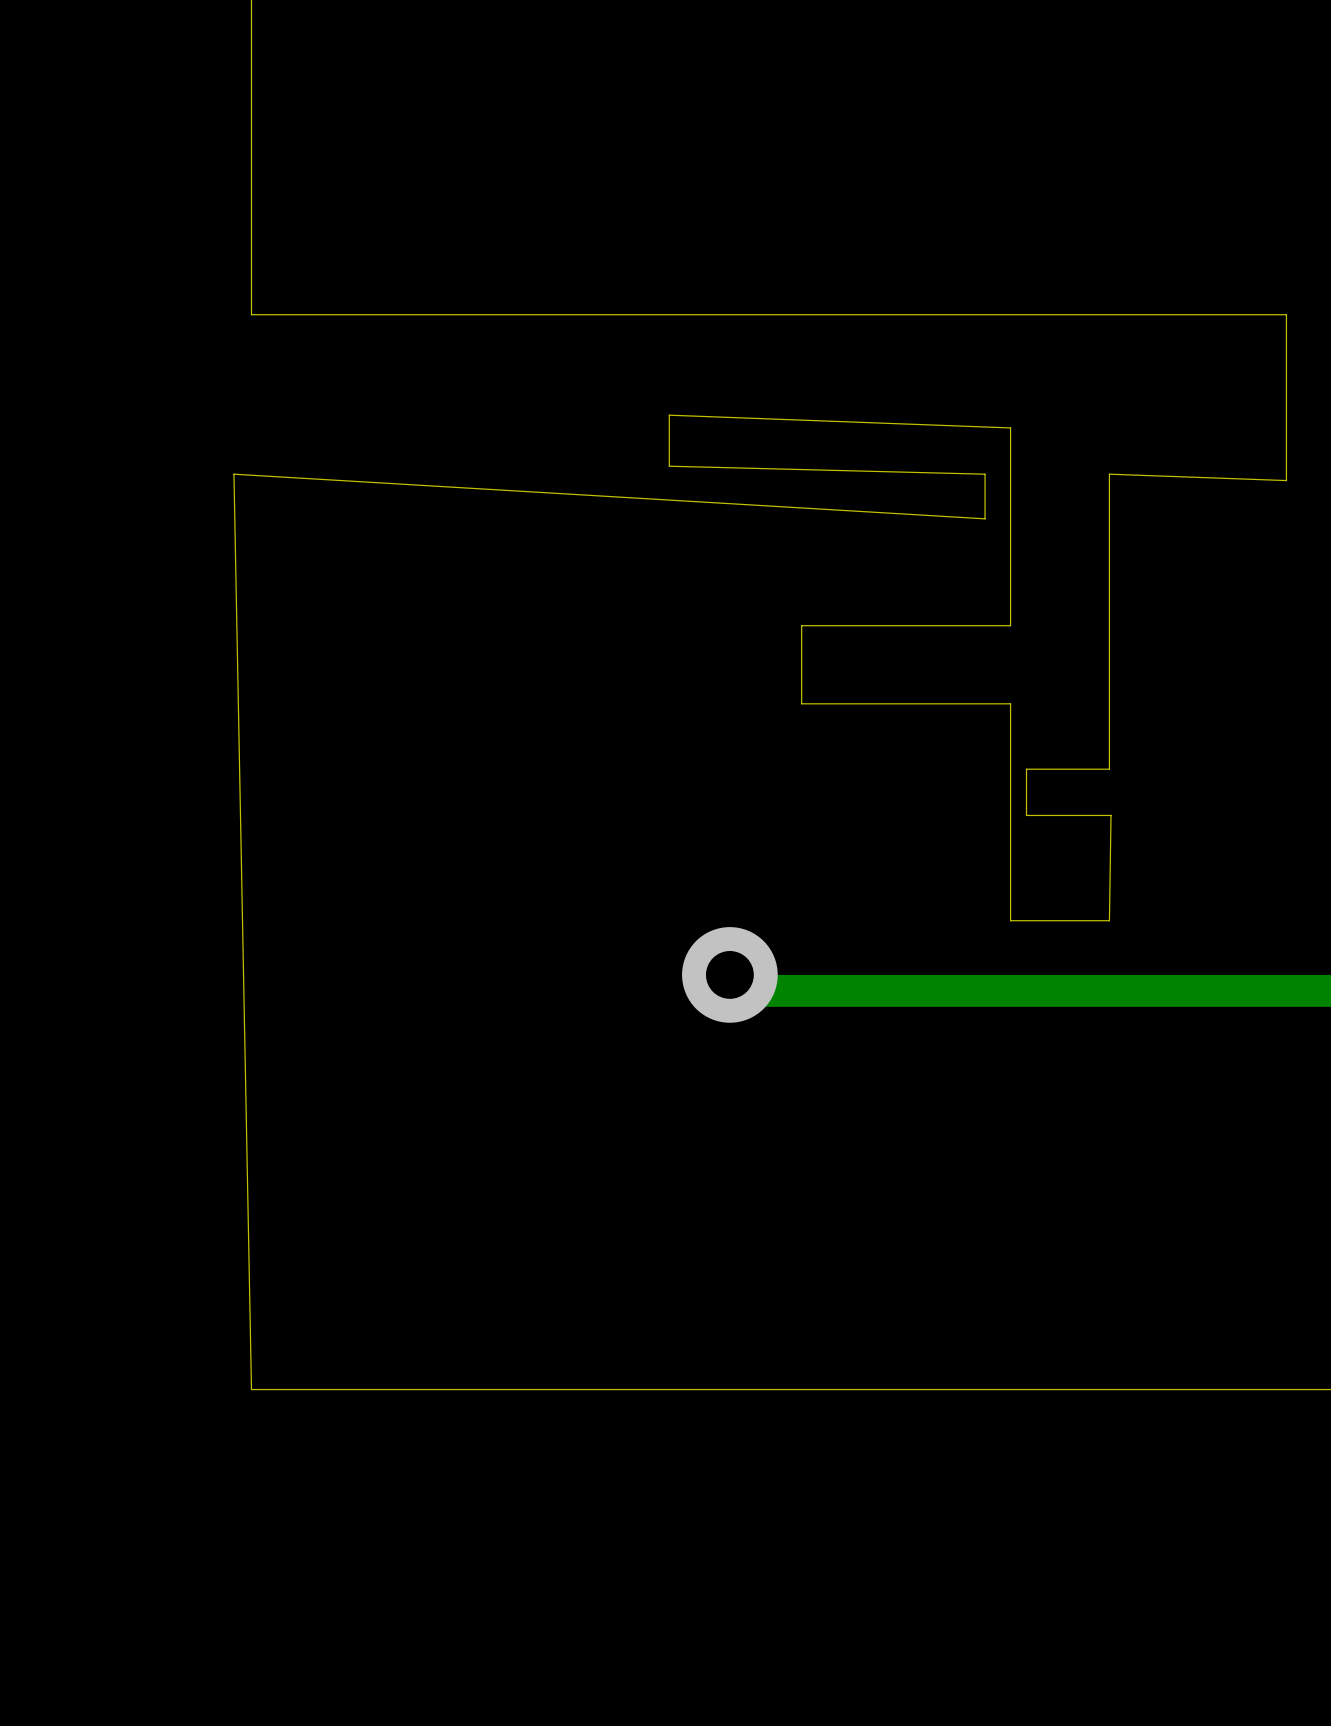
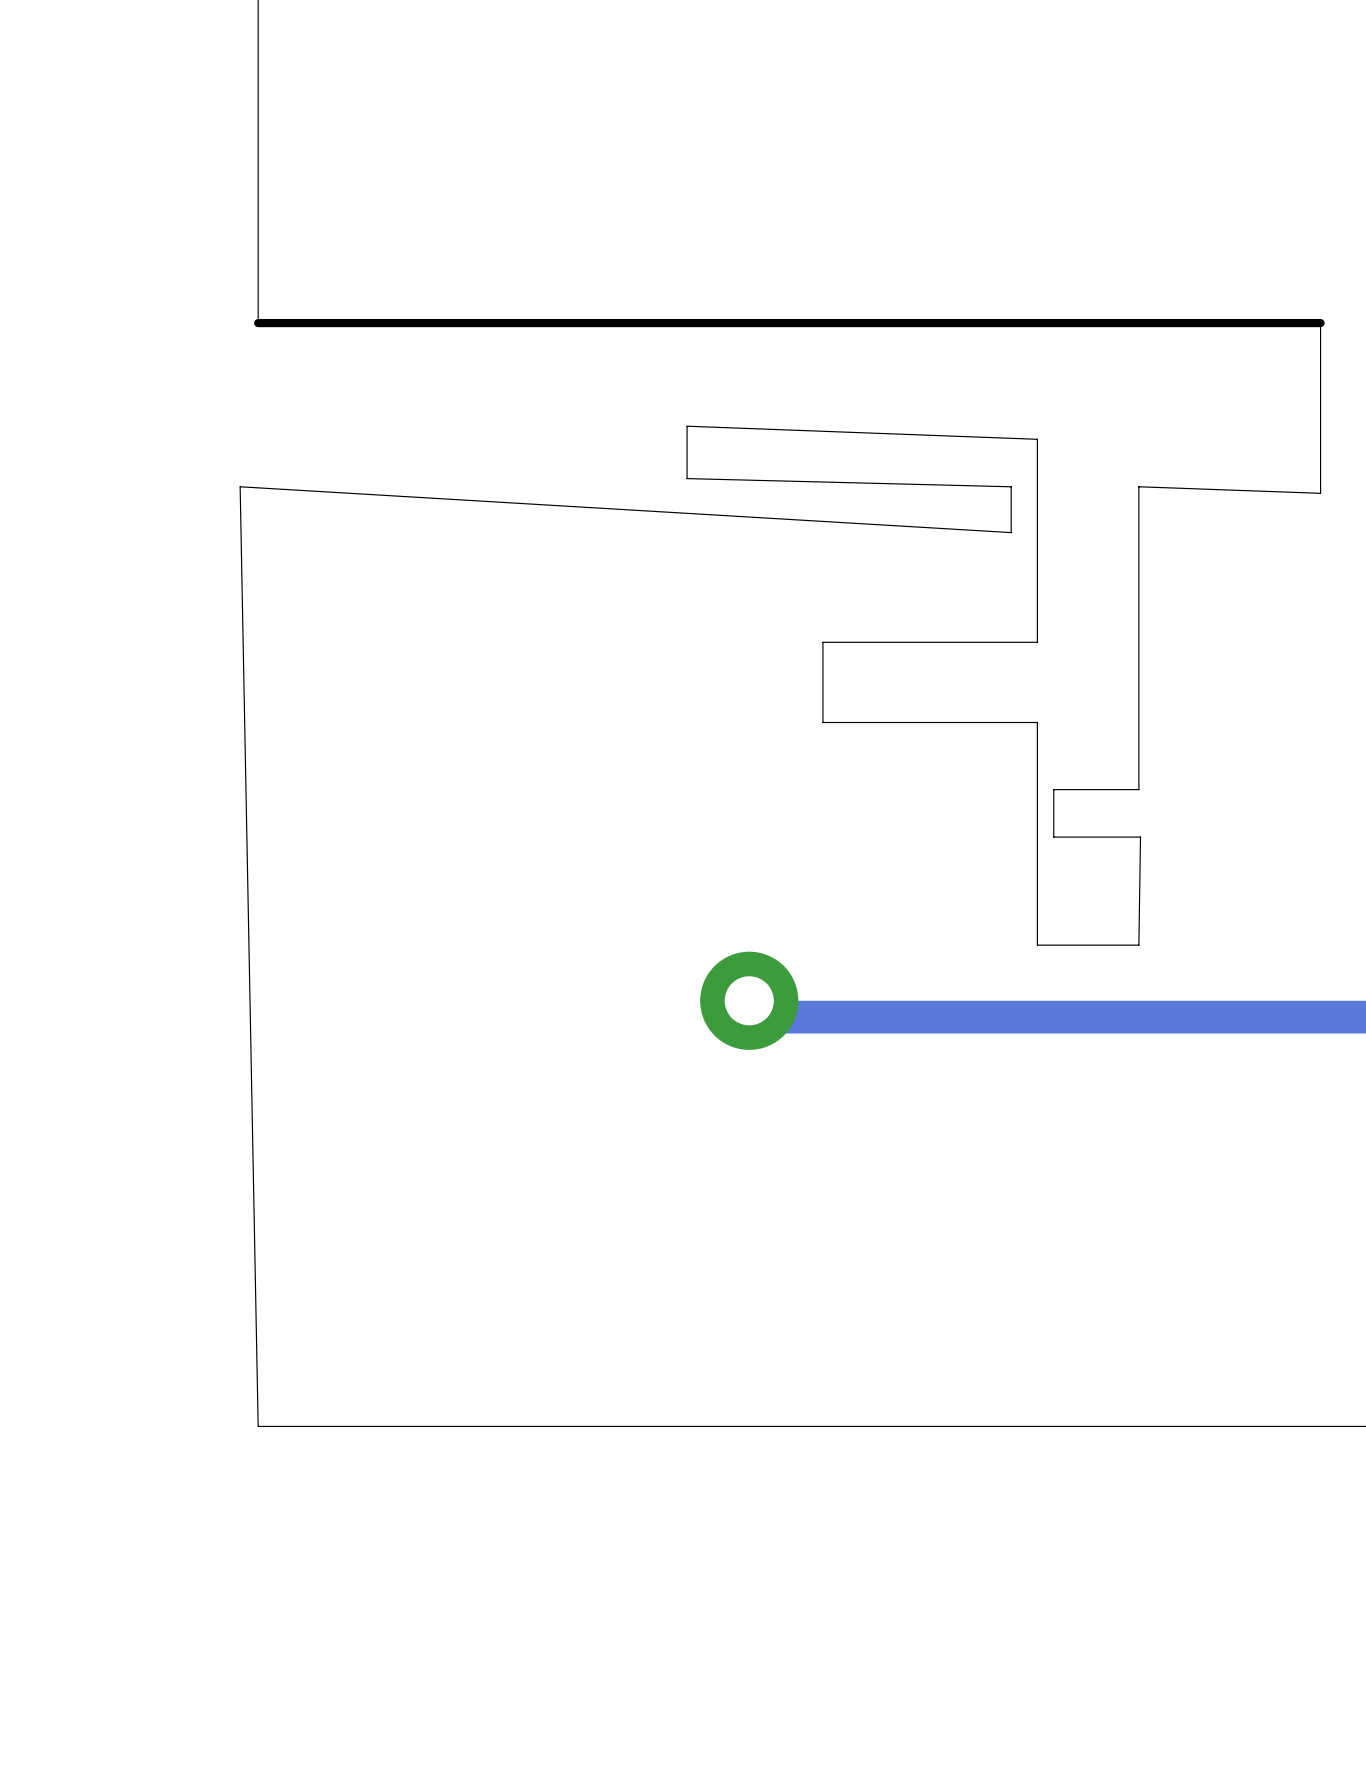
board edge width: thin (1286, 314) (251, 314) -> thick (1320, 323) (258, 323)

